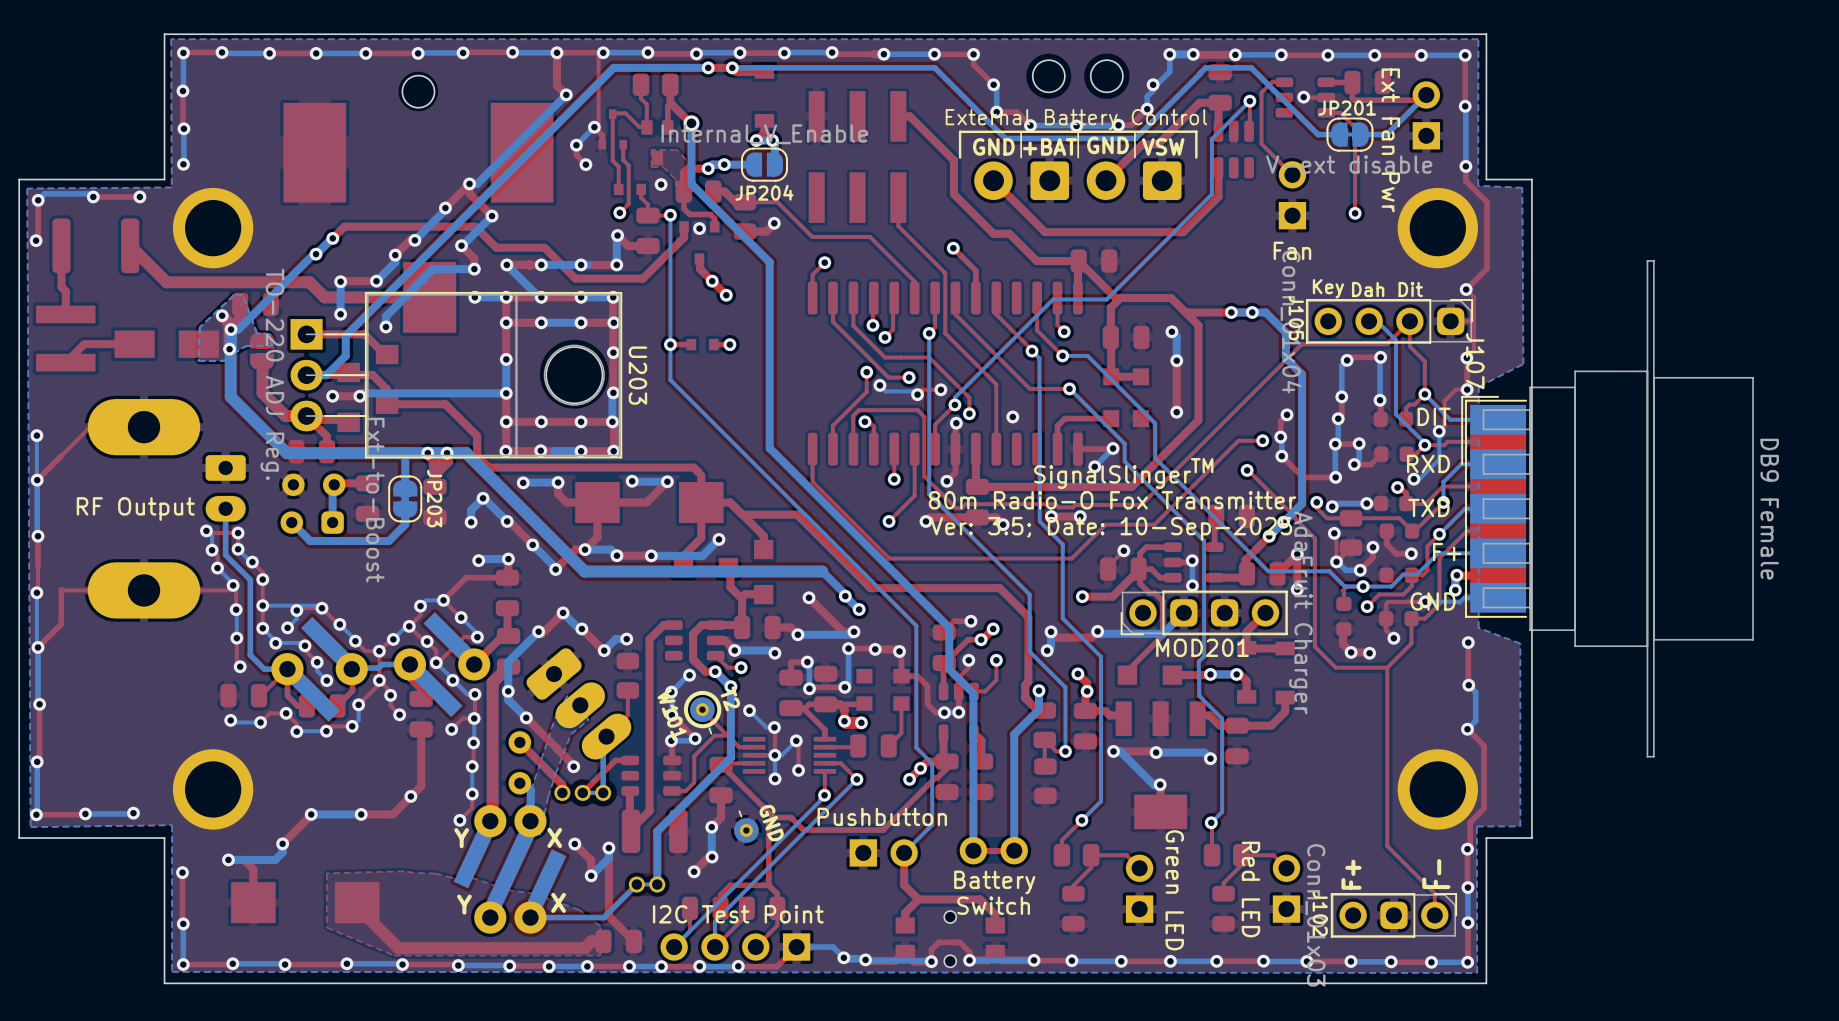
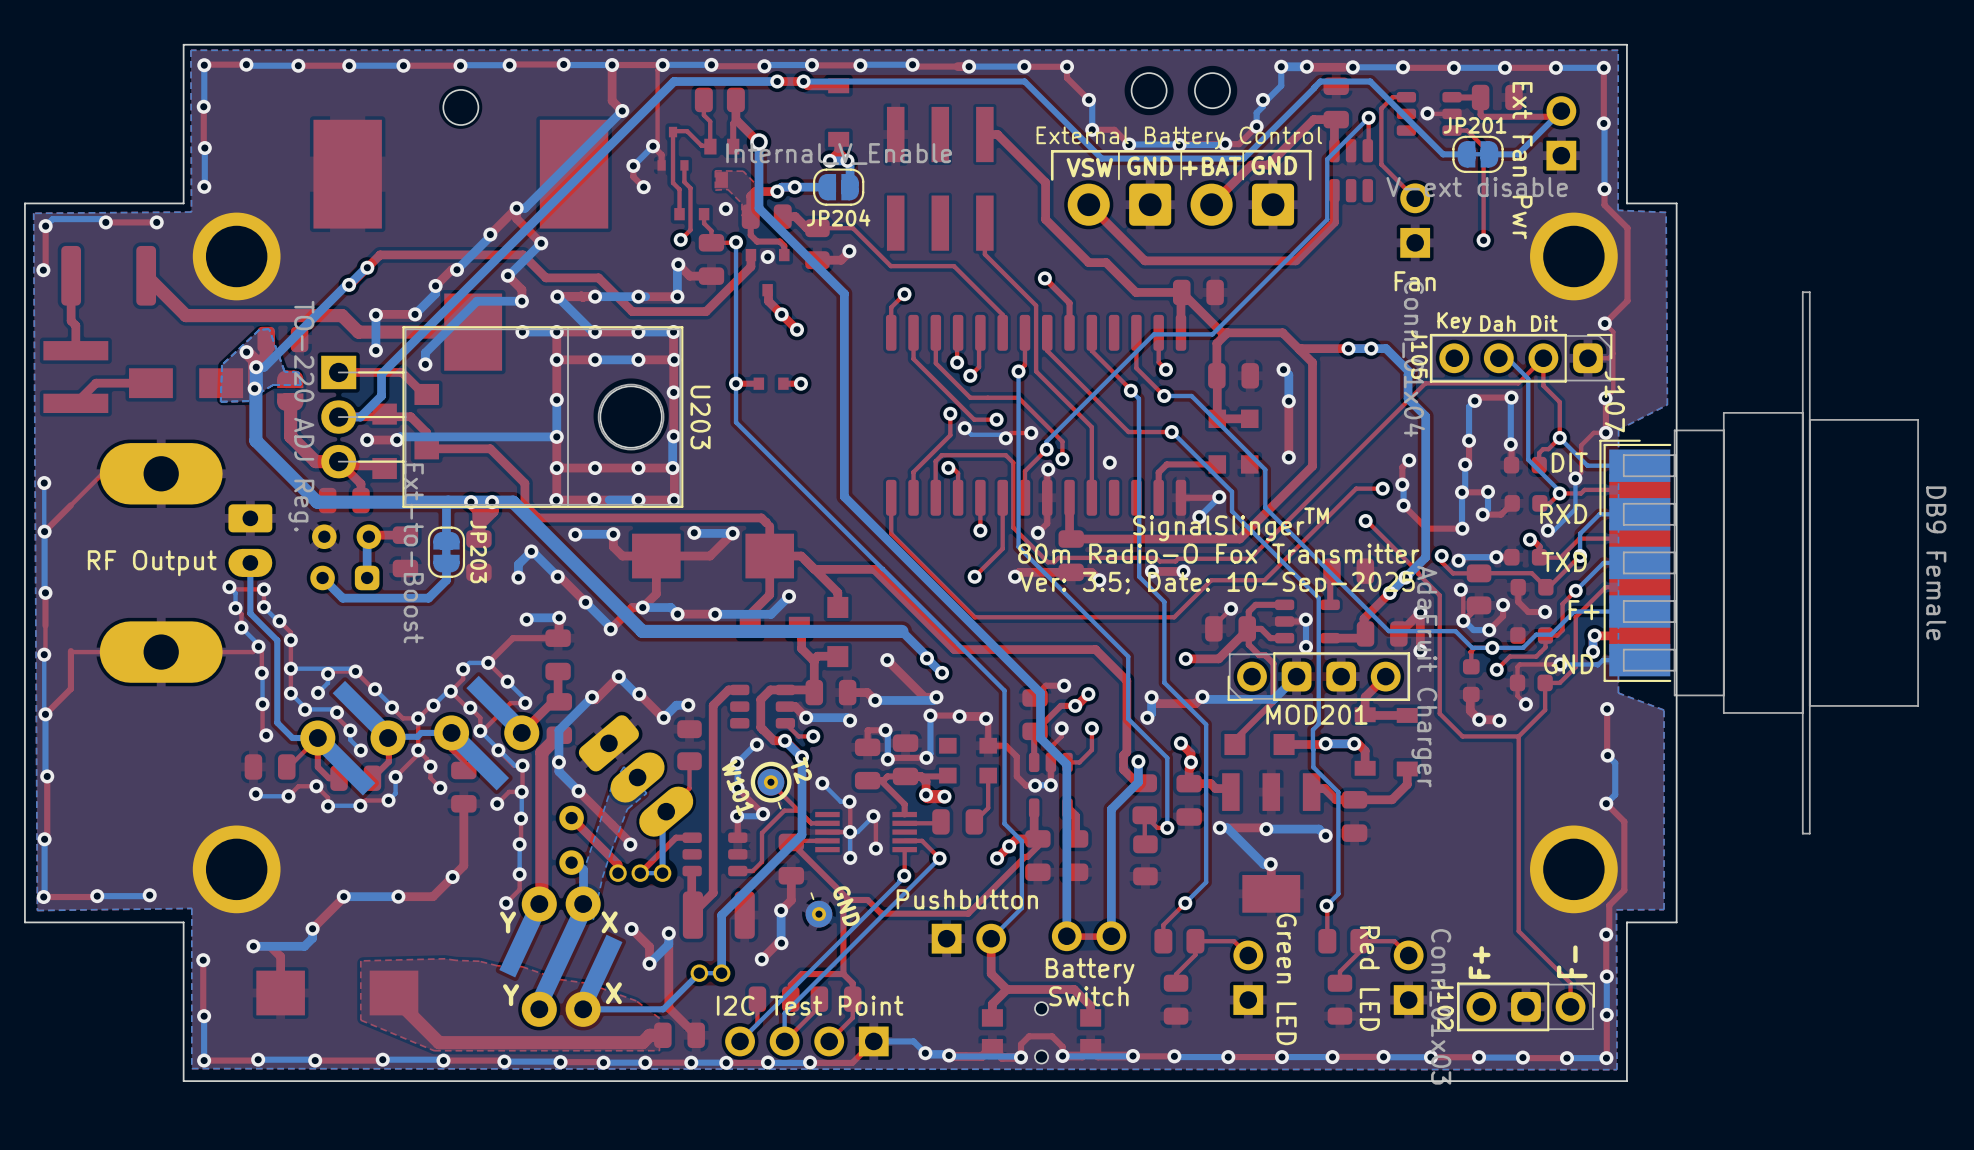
text position: GND (1107, 145) -> GND (1274, 165)
text position: GND (993, 146) -> GND (1150, 166)
text position: +BAT (1050, 146) -> +BAT (1211, 166)
text position: VSW (1163, 146) -> VSW (1089, 167)

